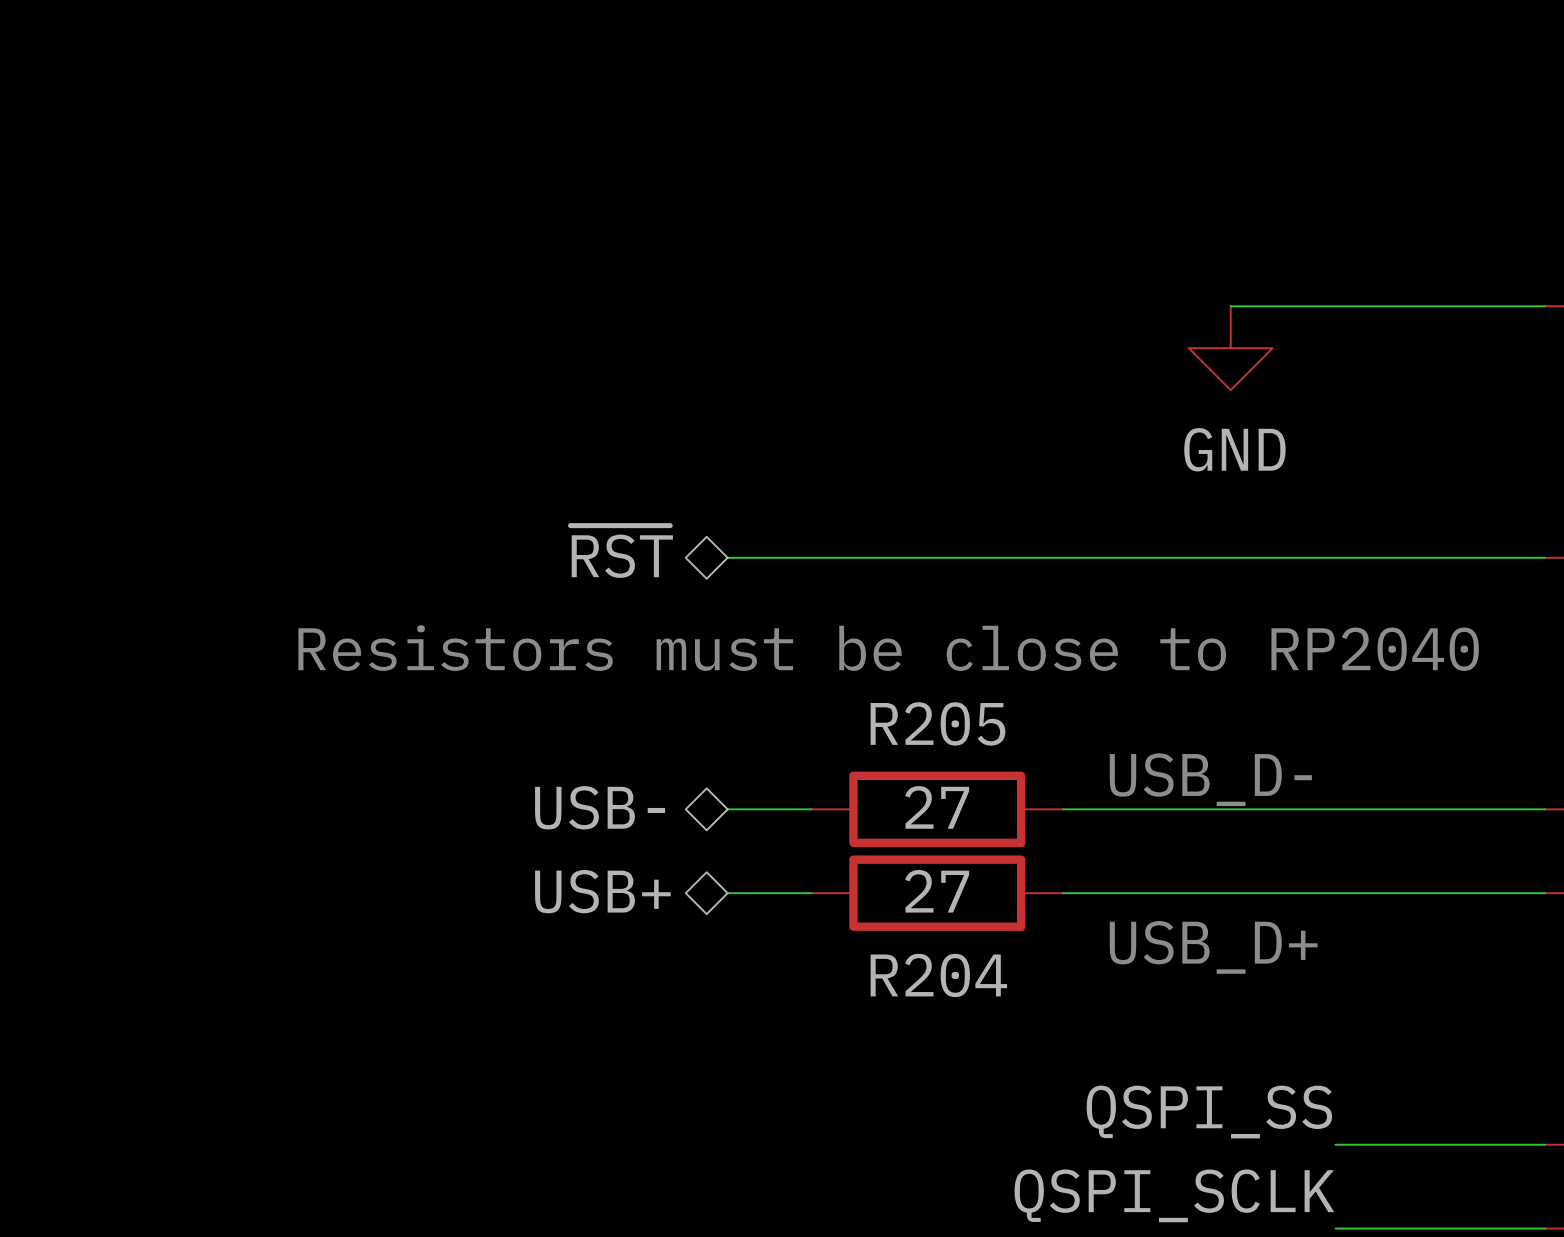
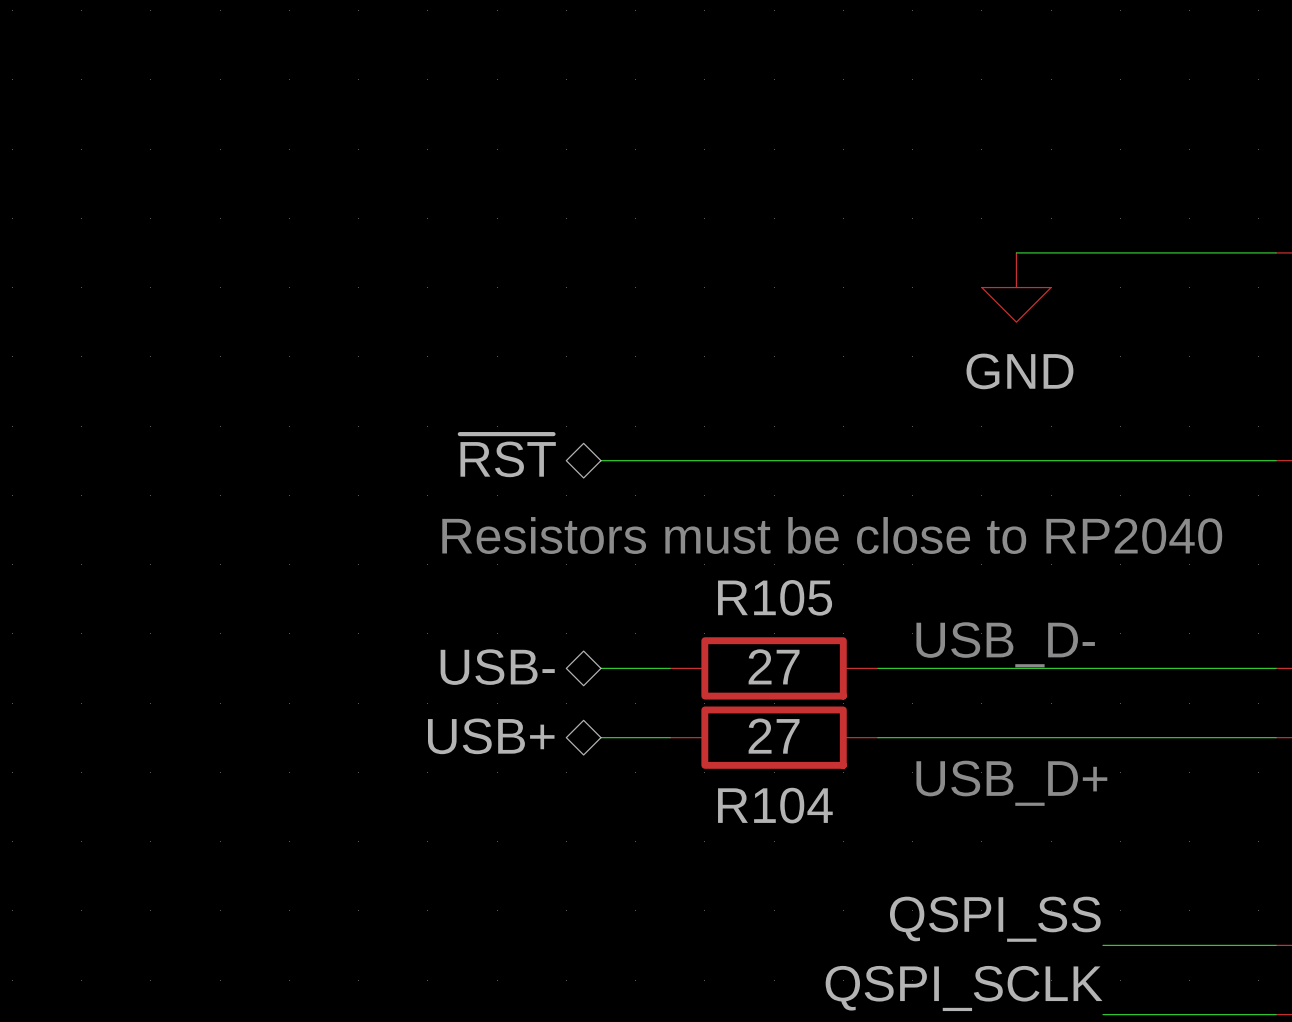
R205 name: R205 (937, 723) -> R105 (775, 597)
R204 name: R204 (938, 975) -> R104 (775, 805)

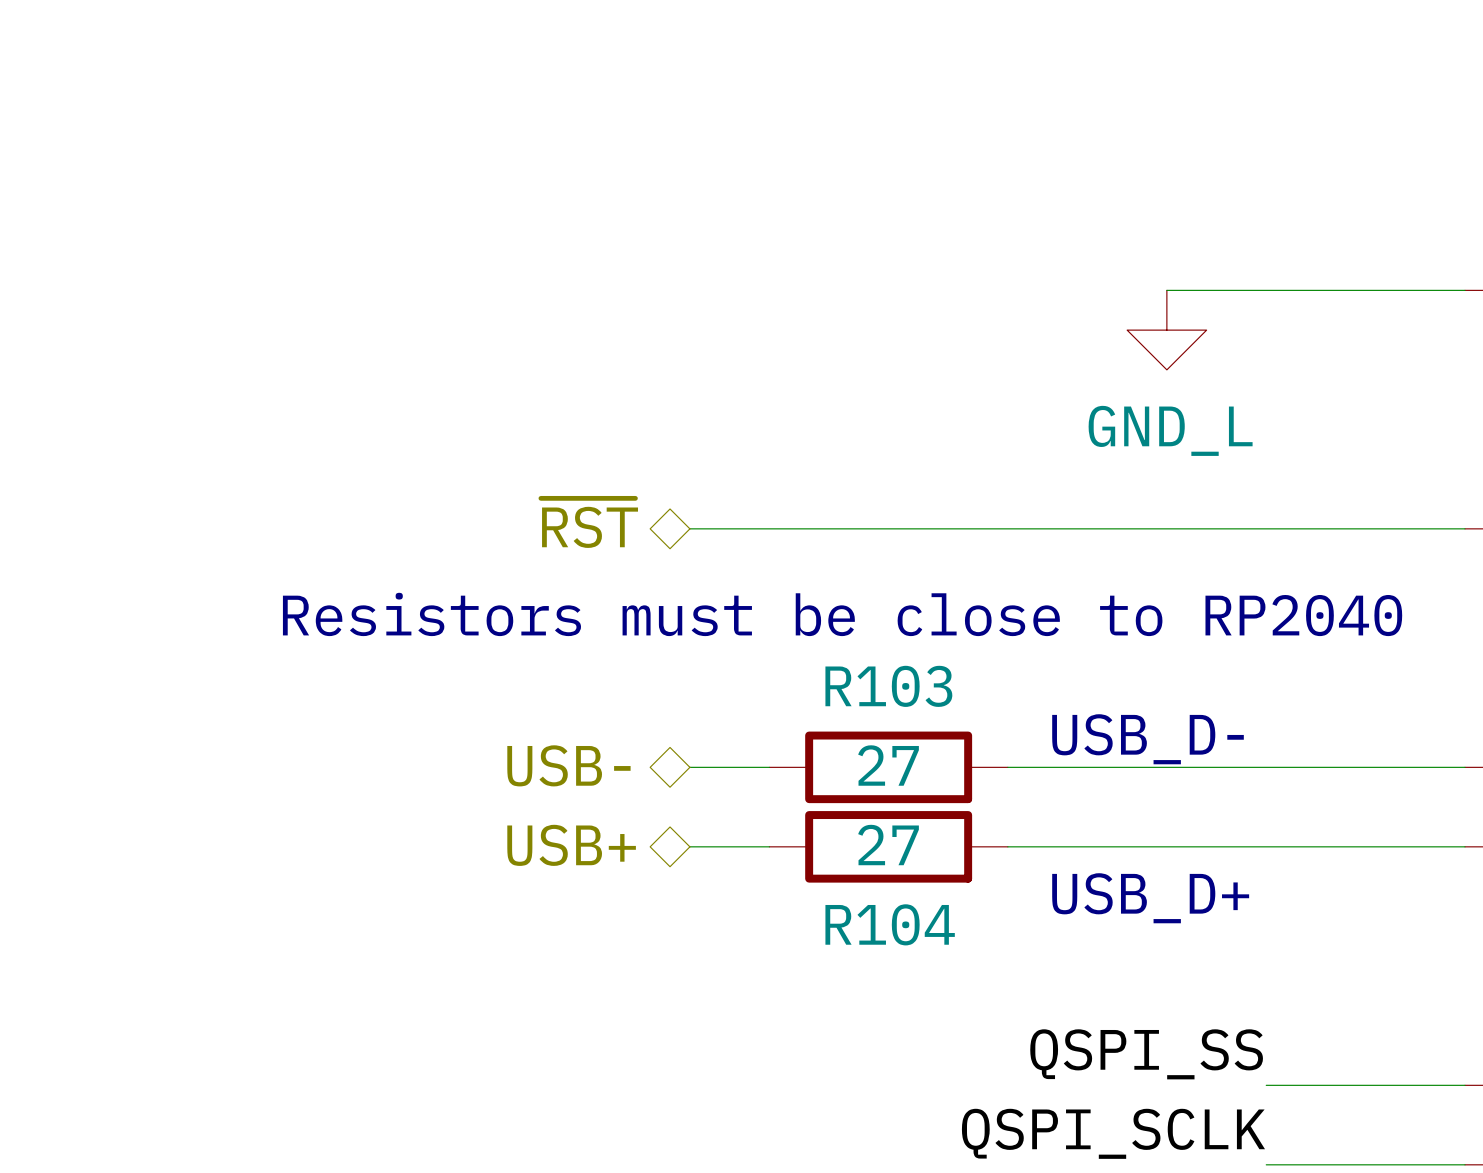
power symbol: GND (1016, 287) -> GND_L (1166, 330)
R105 name: R105 (775, 597) -> R103 (888, 686)

